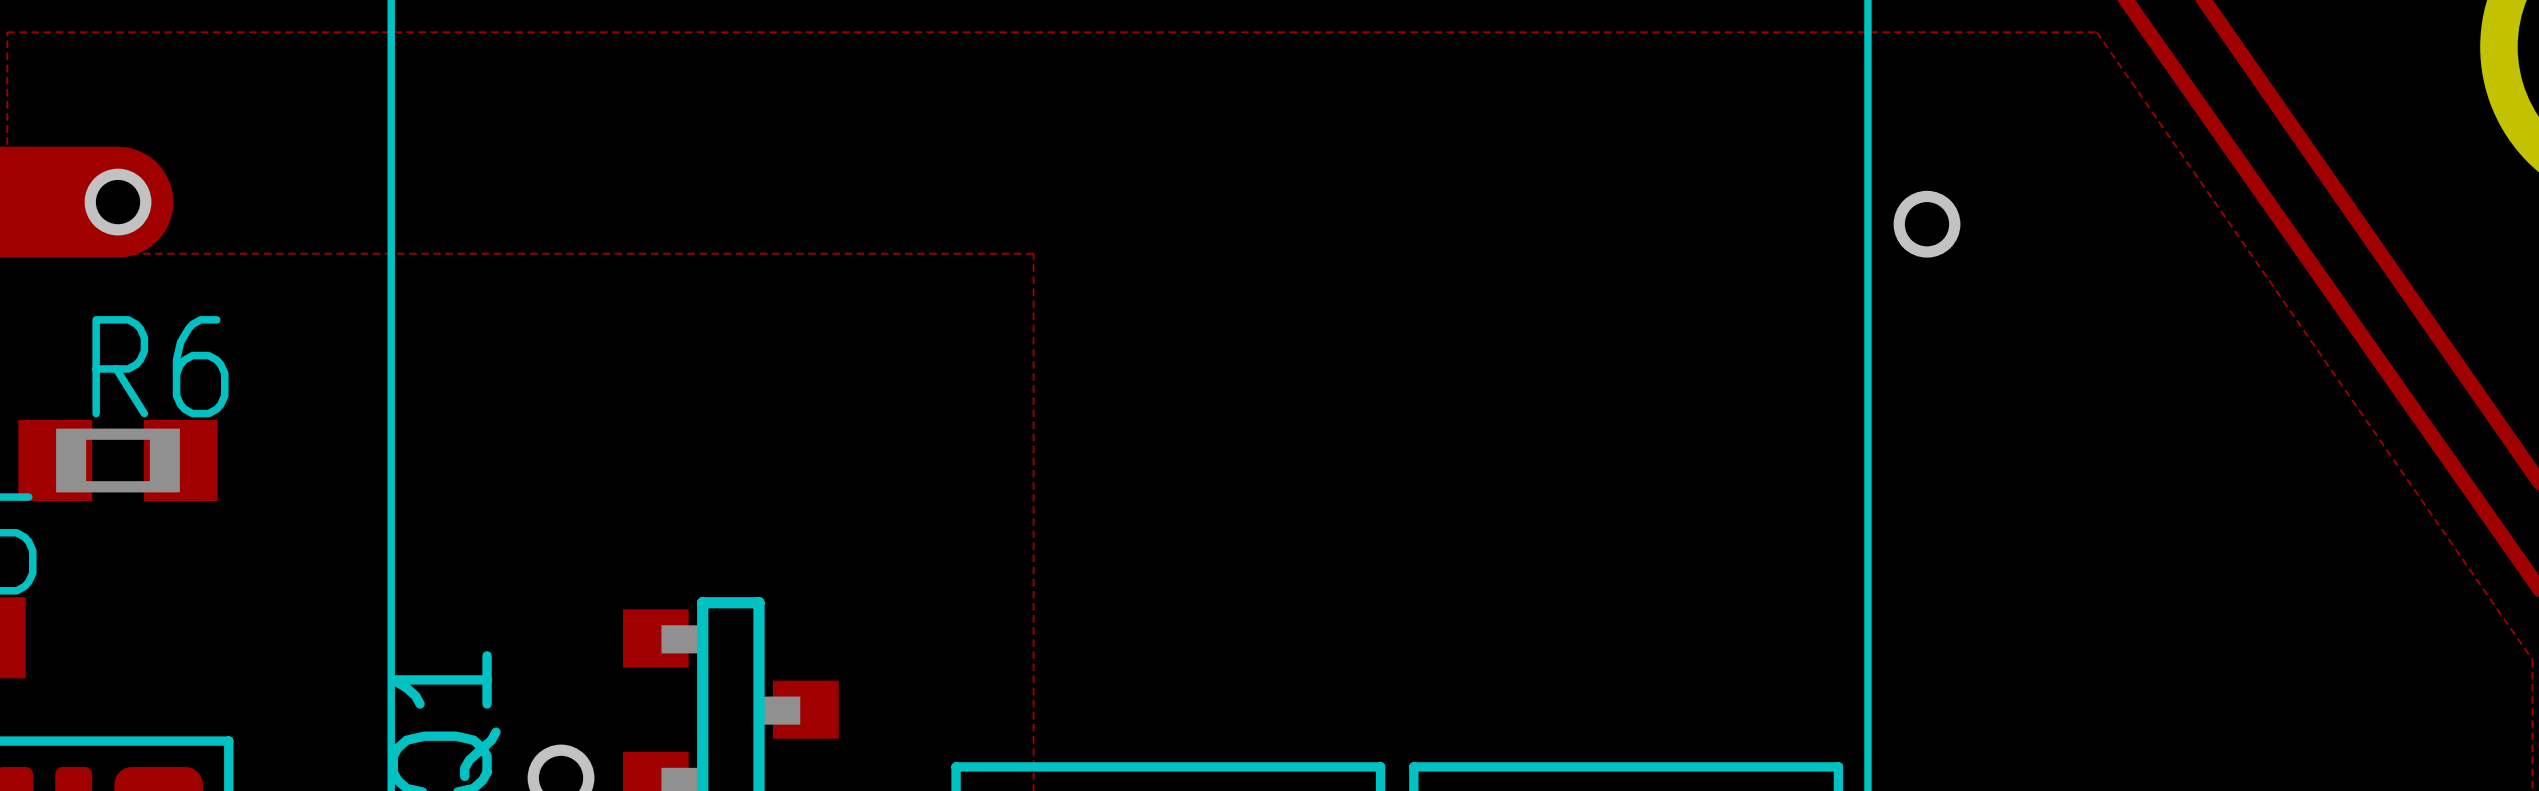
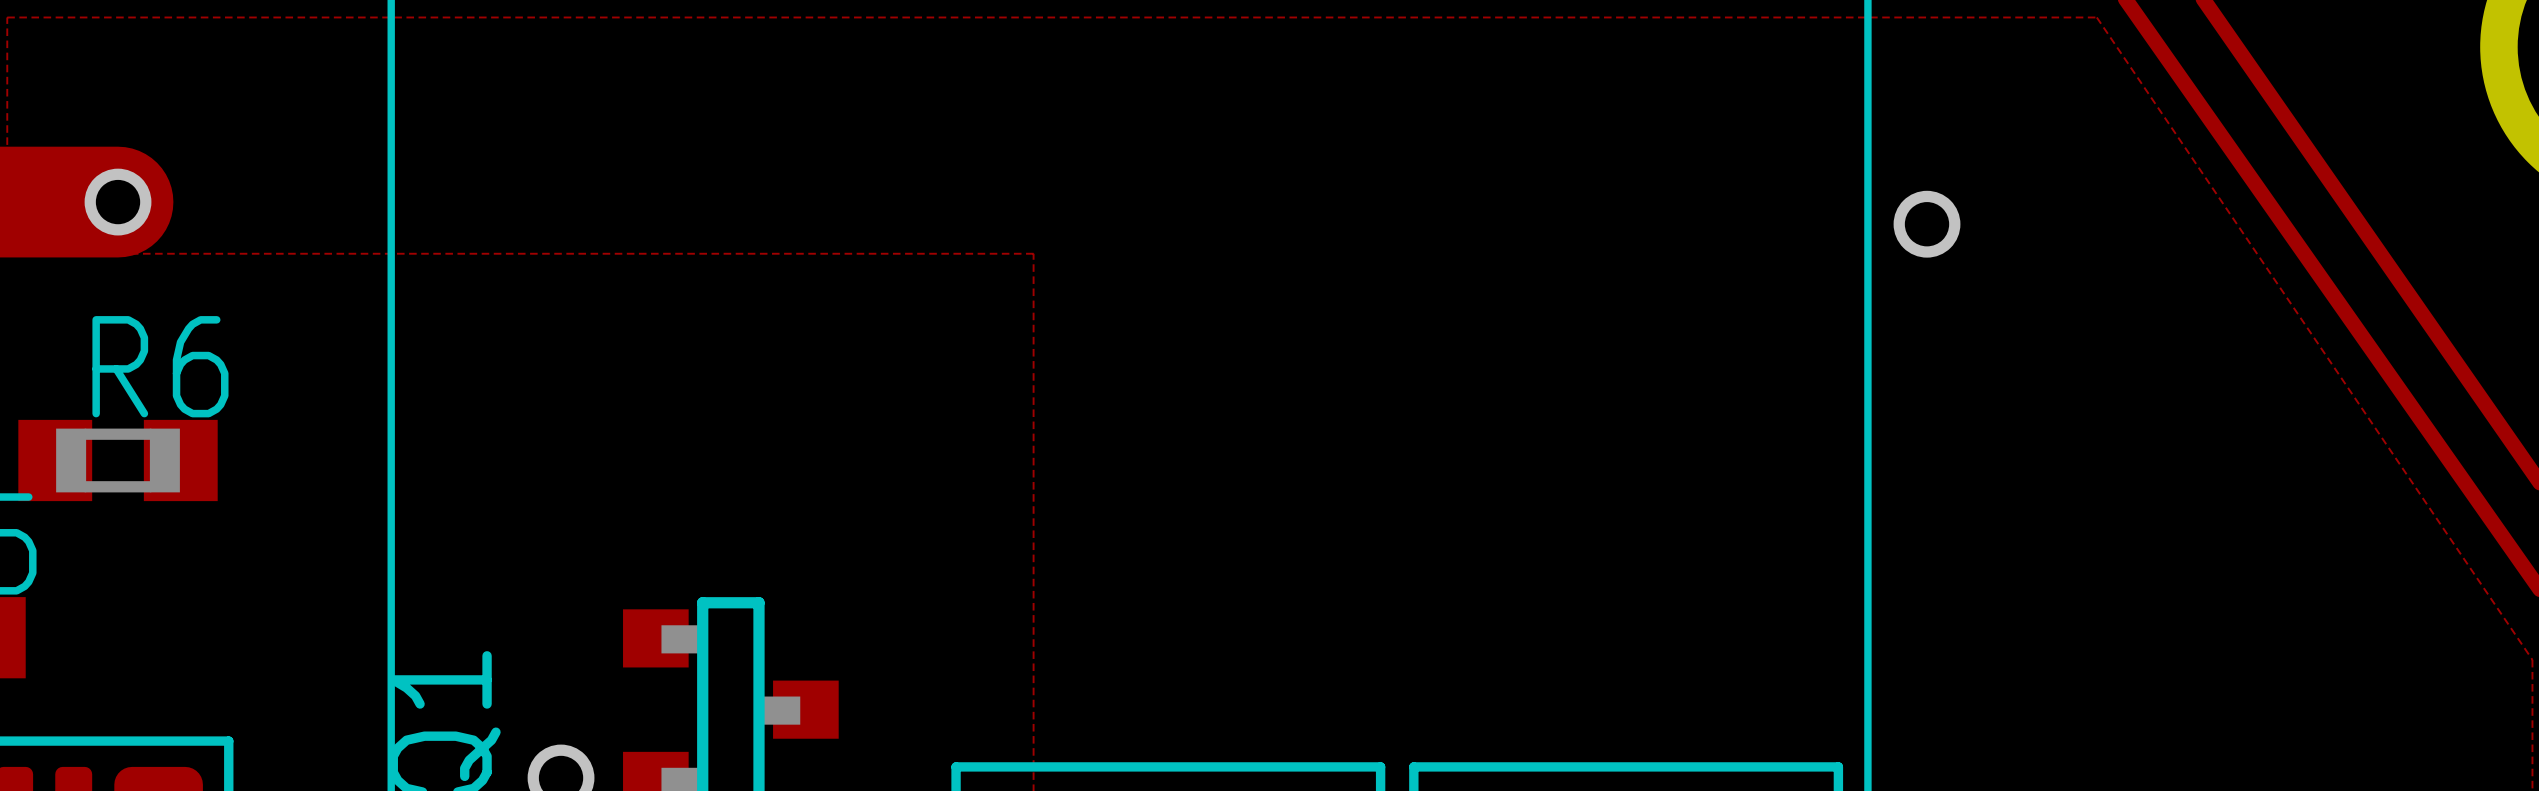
zone outline: (7, 32) (2096, 32) (2532, 659) -> (7, 32) (7, 17) (2096, 17) (2532, 659)

